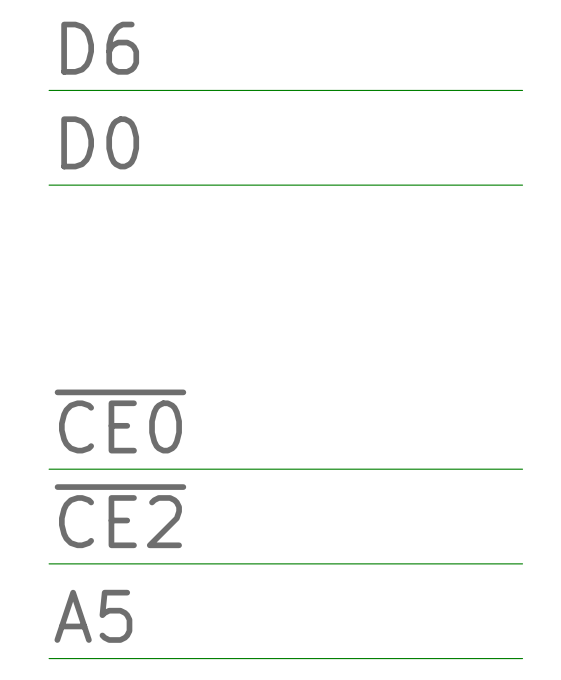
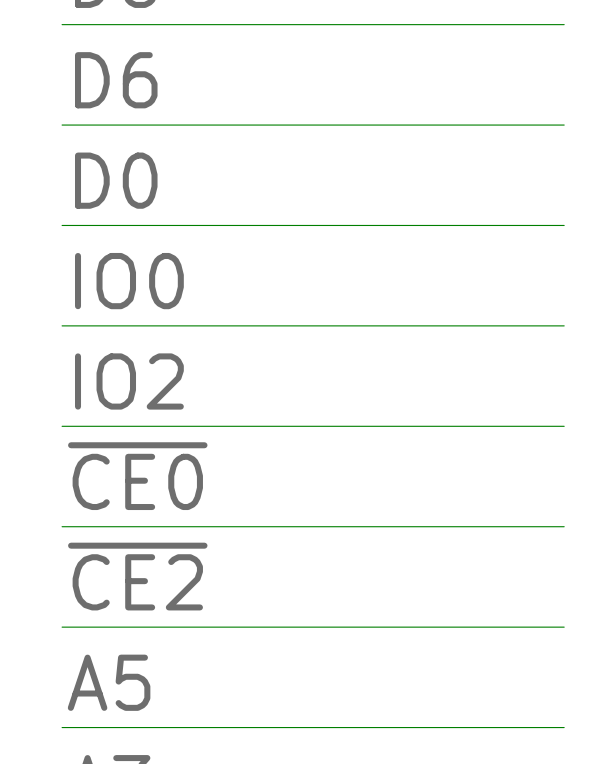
label: none -> IO0 (129, 281)
wire: none -> (62, 325) (564, 325)
label: none -> IO2 (129, 381)
wire: none -> (62, 426) (564, 426)

